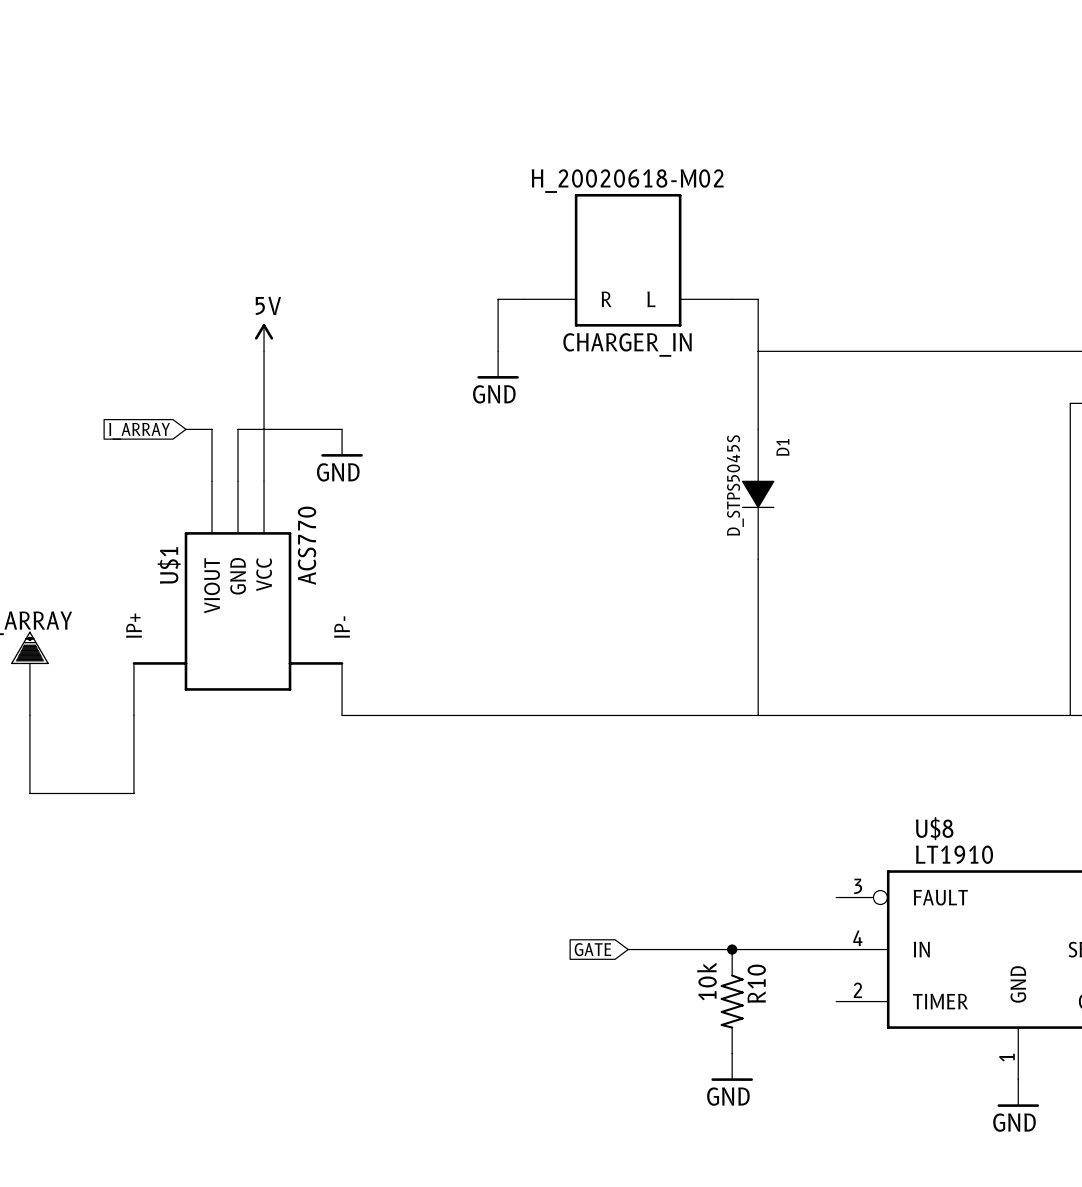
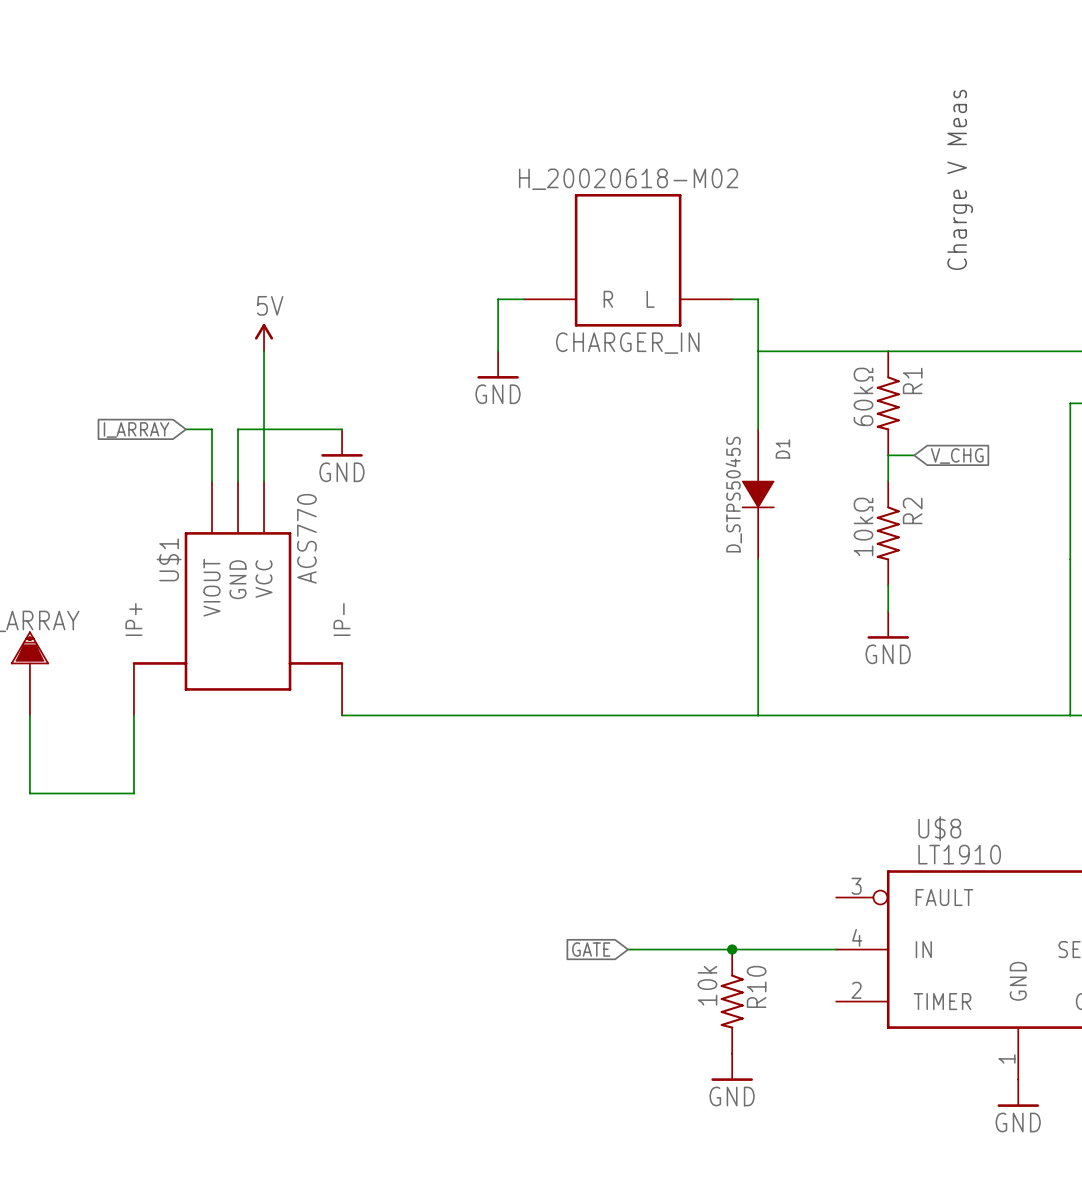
text: none -> Charge V Meas (960, 179)
R1: none -> 60kΩ (888, 403)
wire: none -> (914, 455) (888, 455) (888, 481)
global label: none -> V_CHG (957, 455)
R2: none -> 10kΩ (888, 533)
wire: none -> (888, 585) (888, 611)
power symbol: none -> GND (888, 625)

